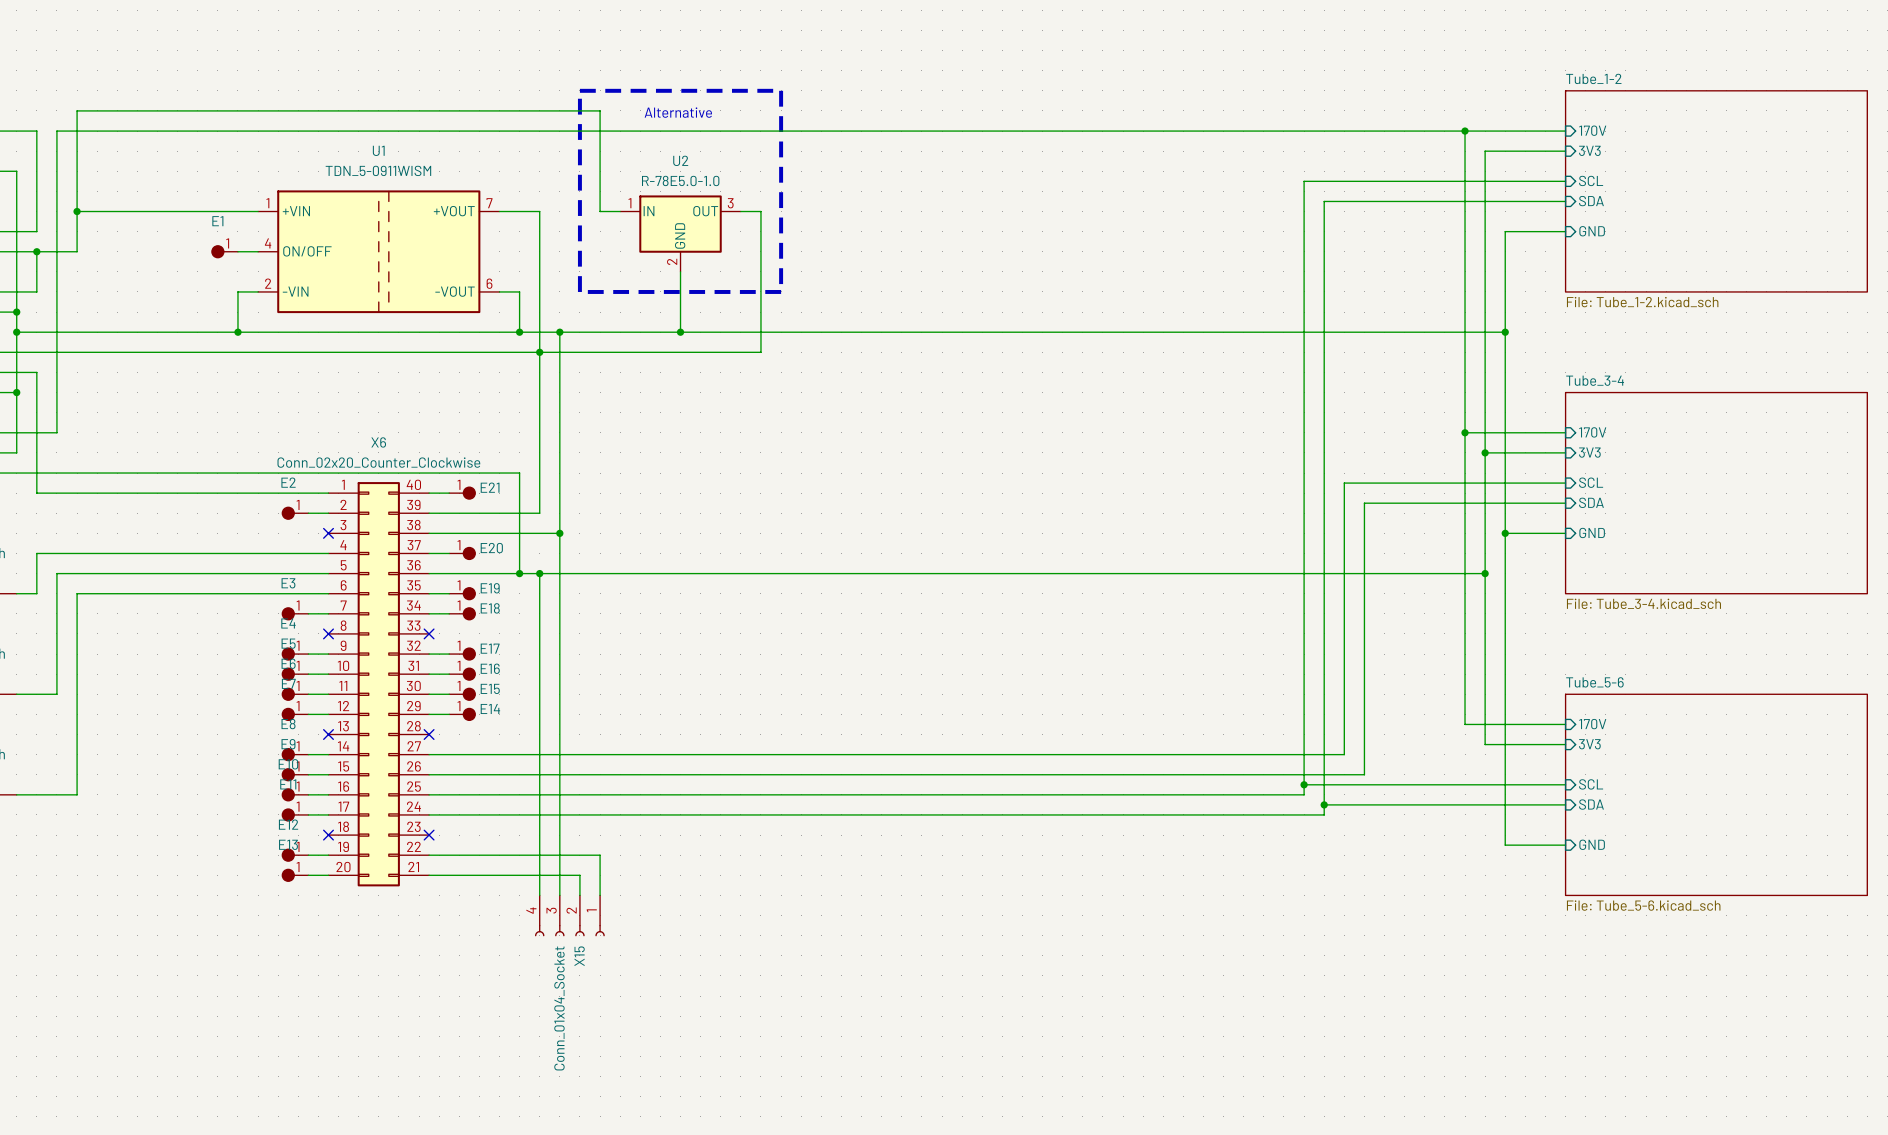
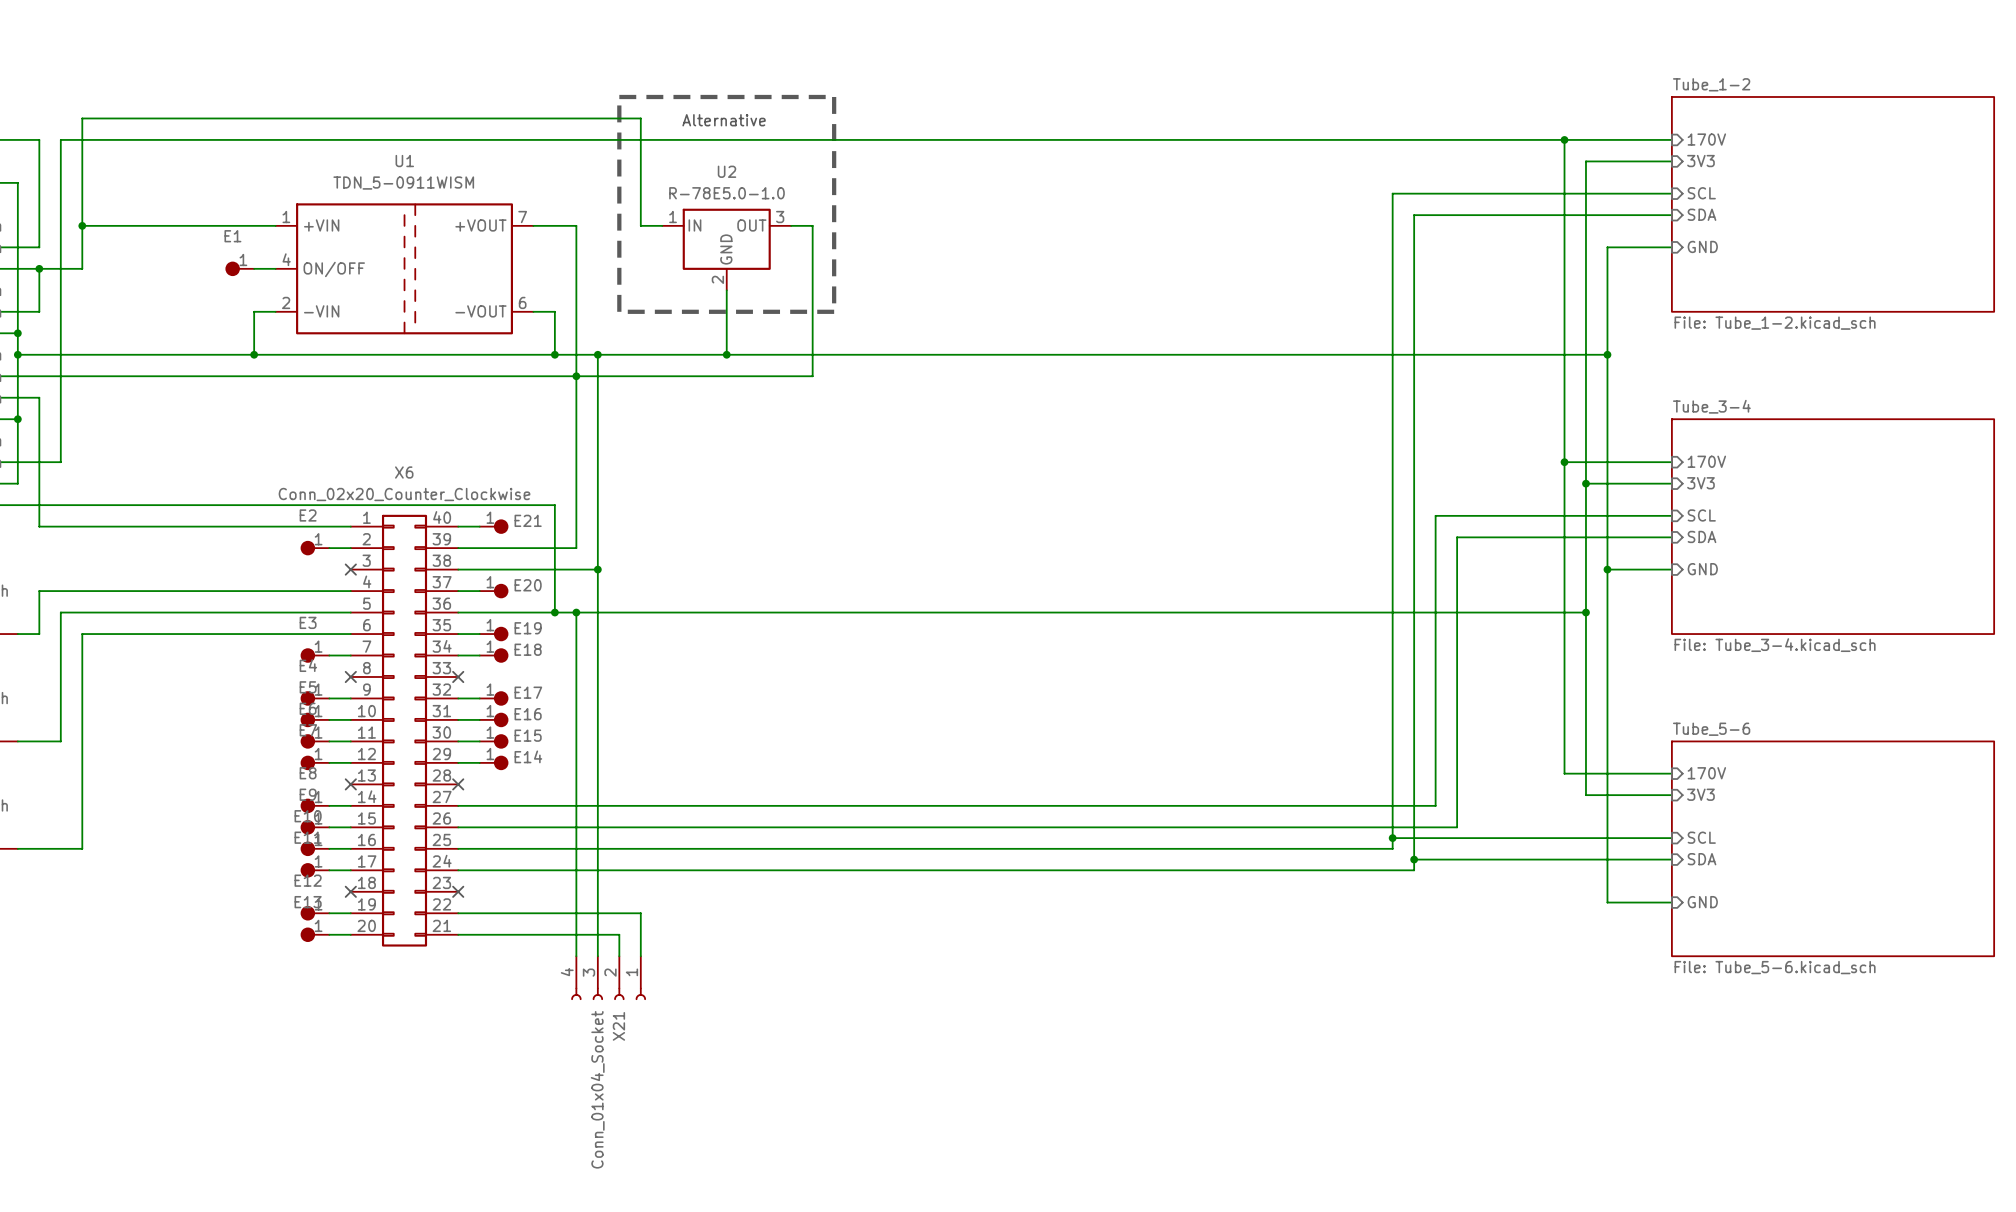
X15 name: X15 (579, 956) -> X21 (618, 1026)

